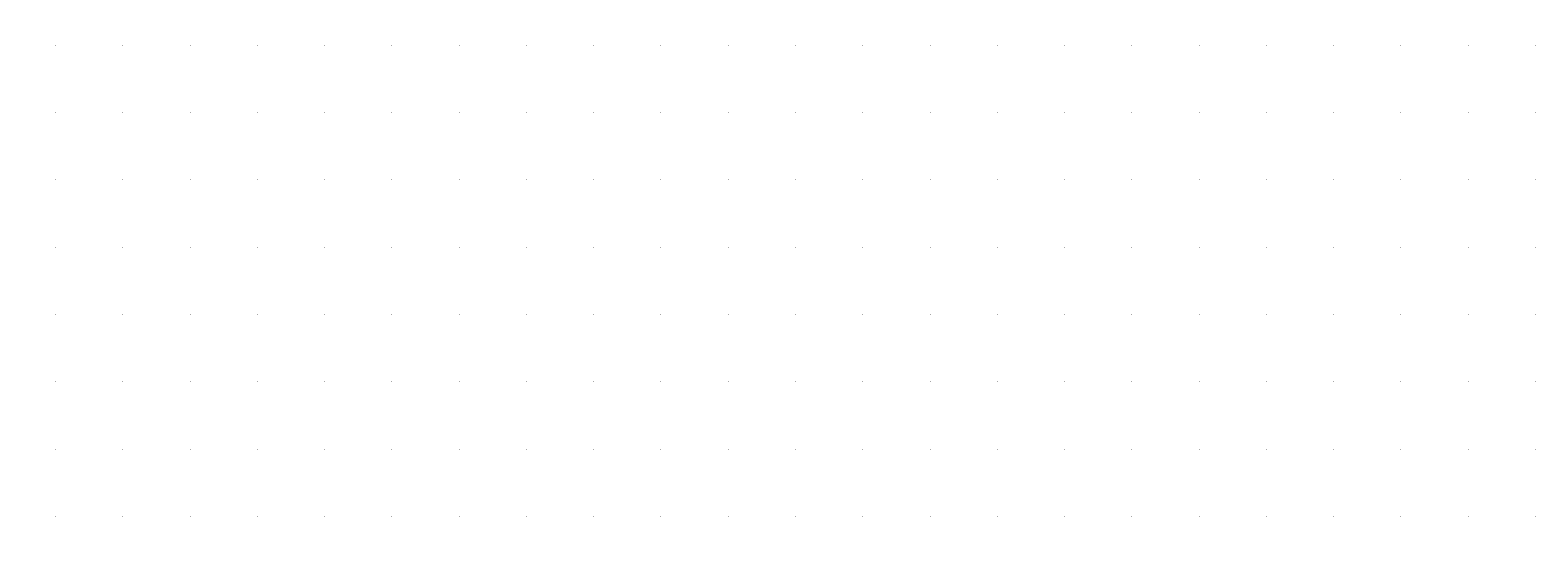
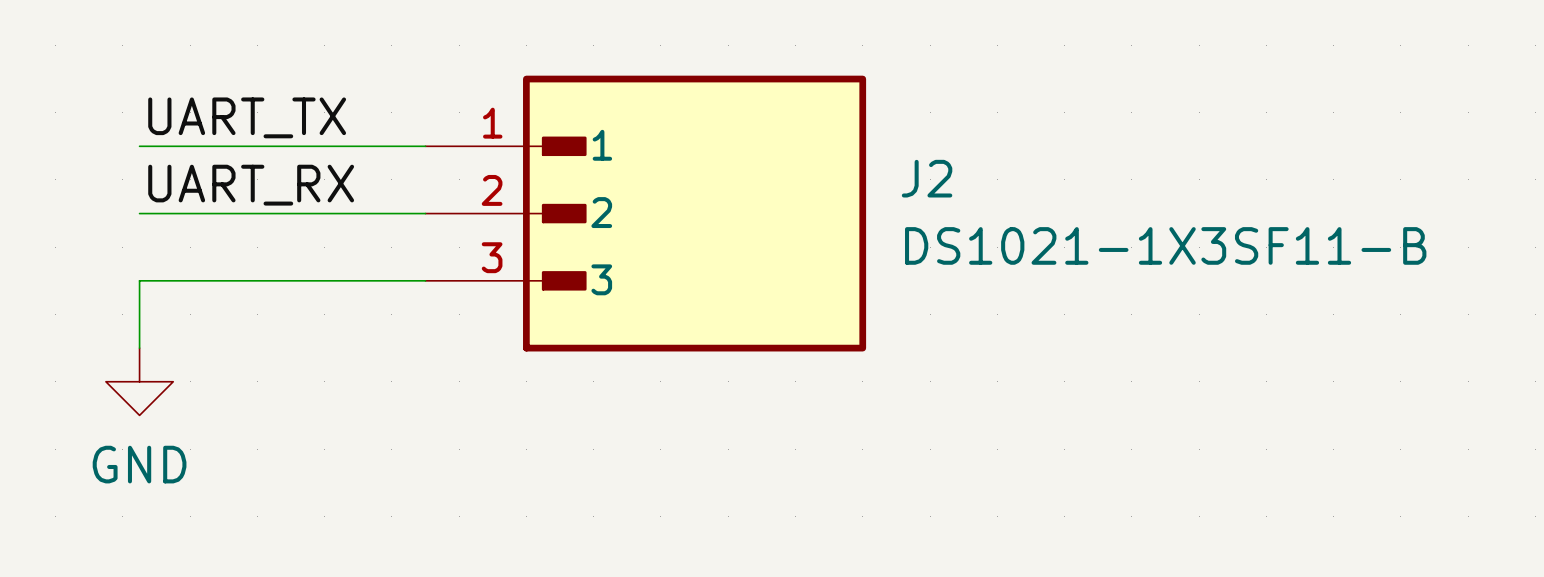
label: none -> UART_TX (247, 117)
wire: none -> (139, 146) (425, 146)
label: none -> UART_RX (251, 185)
wire: none -> (139, 213) (425, 213)
J2: none -> DS1021-1X3SF11-B (645, 213)
wire: none -> (425, 280) (139, 280) (139, 348)
power symbol: none -> GND (139, 381)

